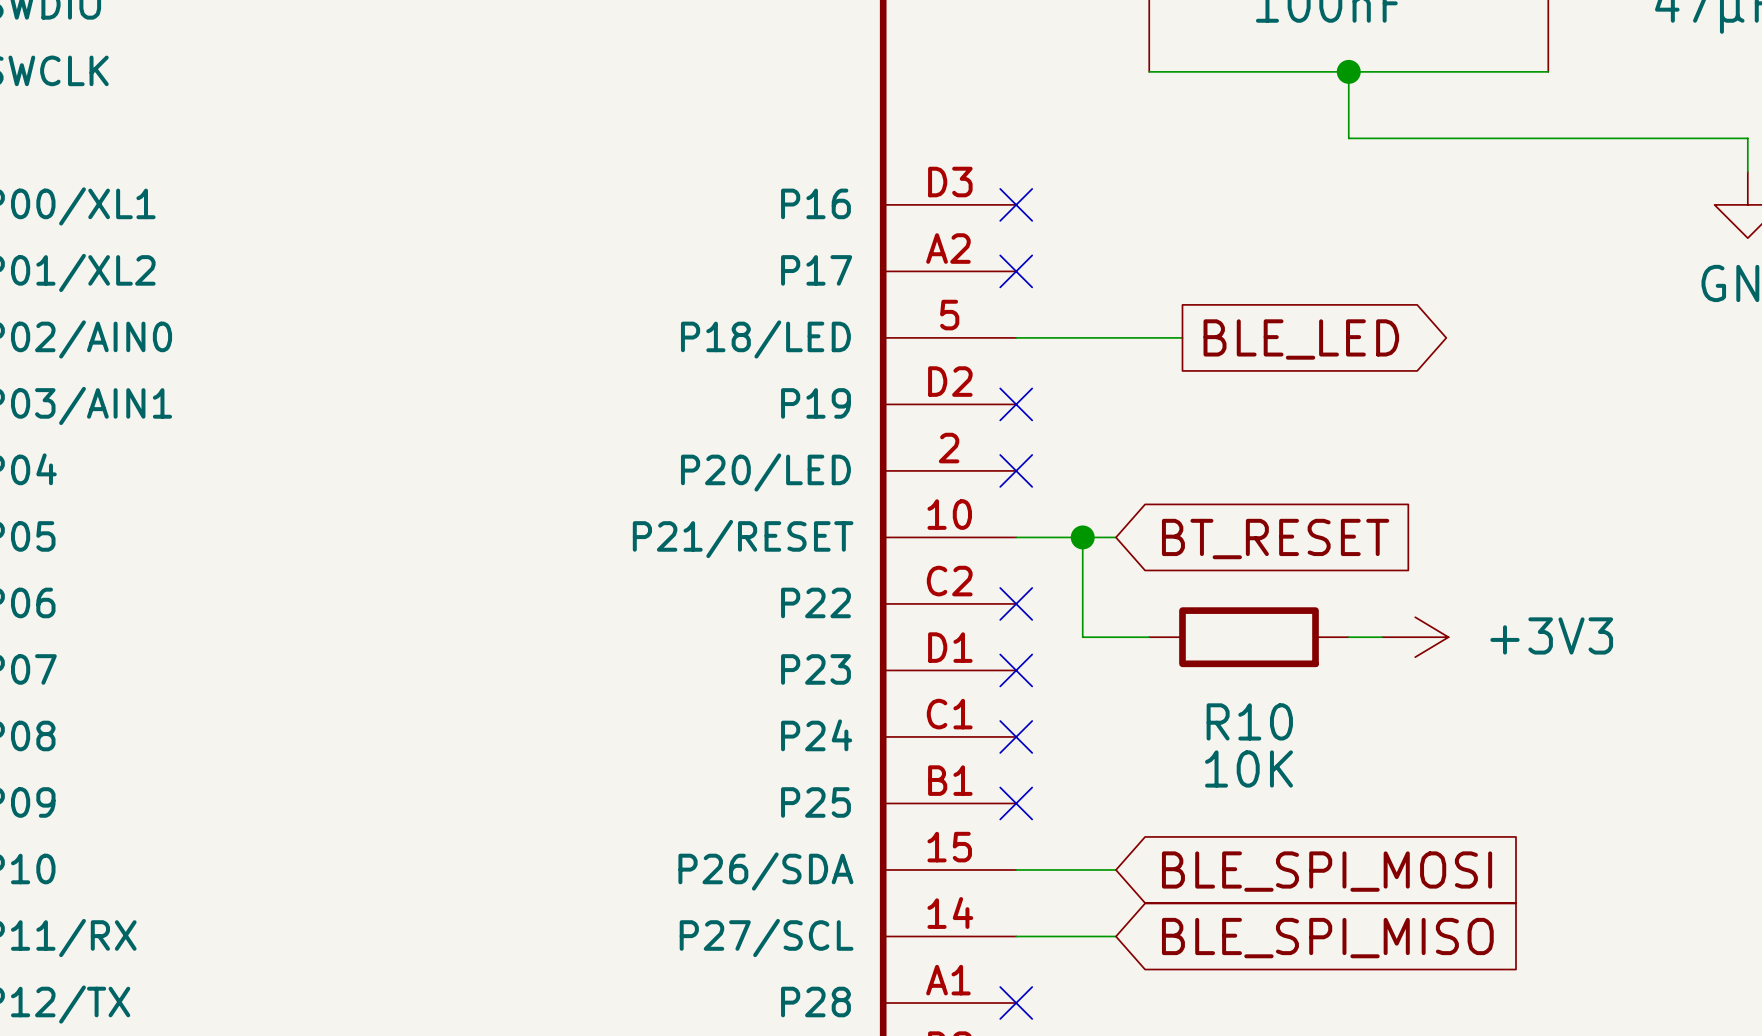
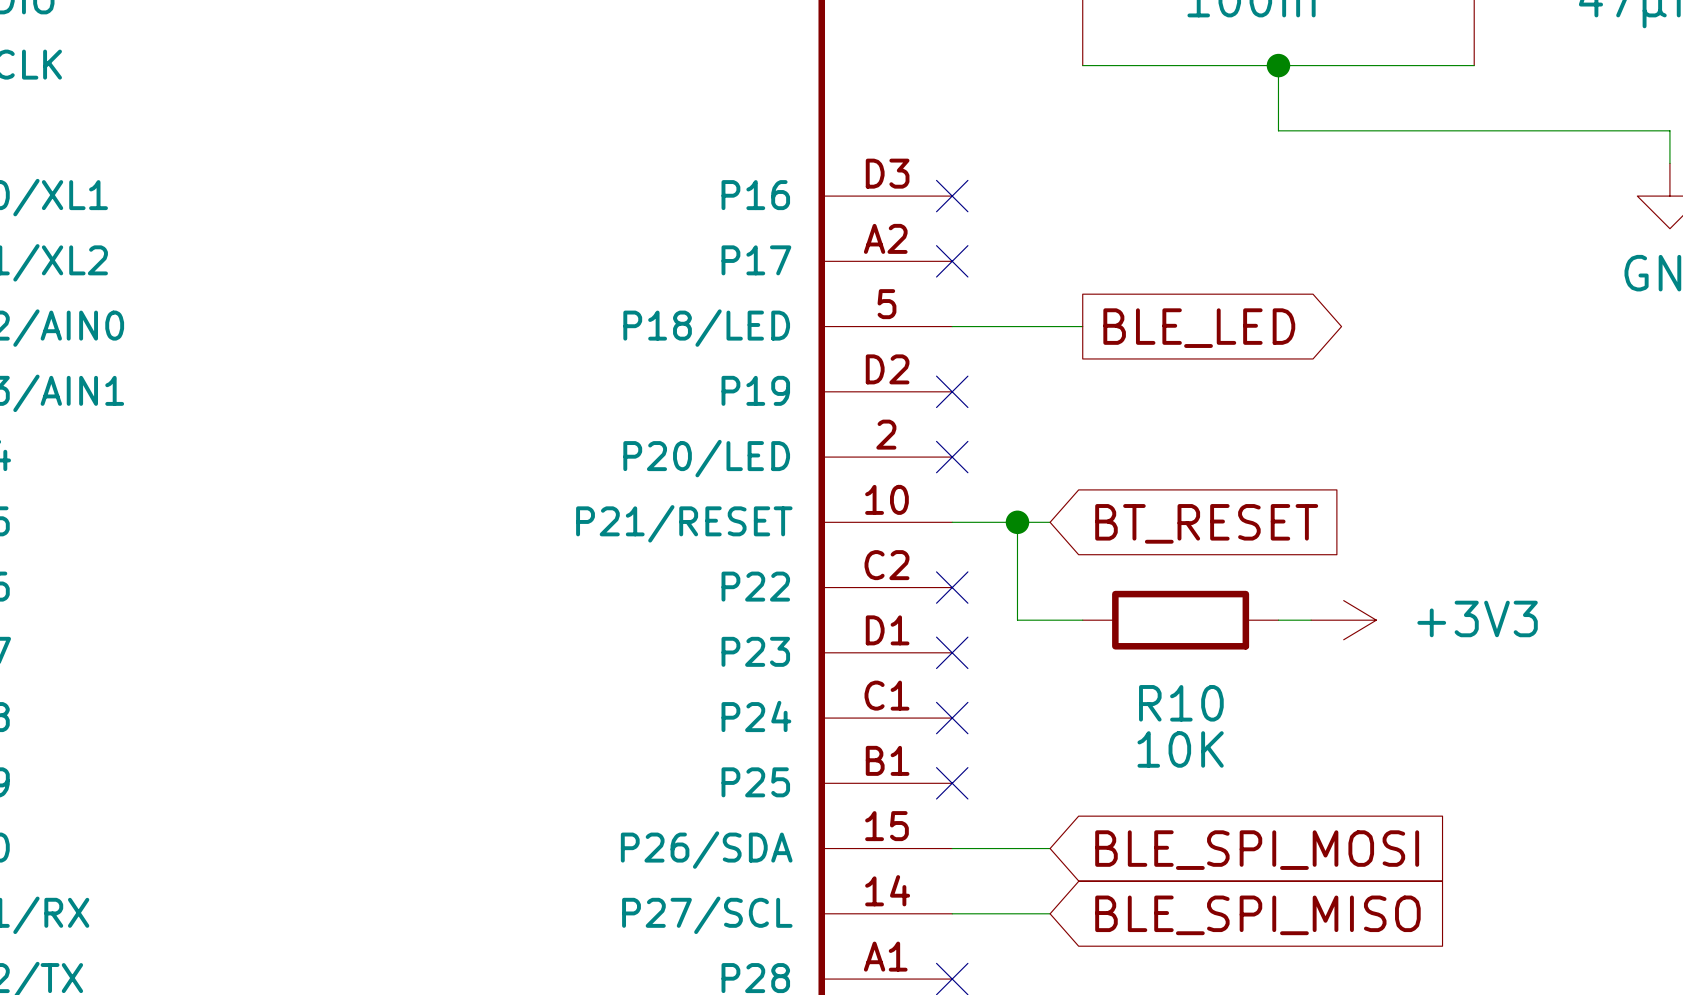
wire: (1149, 337) (1182, 337) -> none
global label position: BLE_LED (1301, 339) -> BLE_LED (1199, 328)

